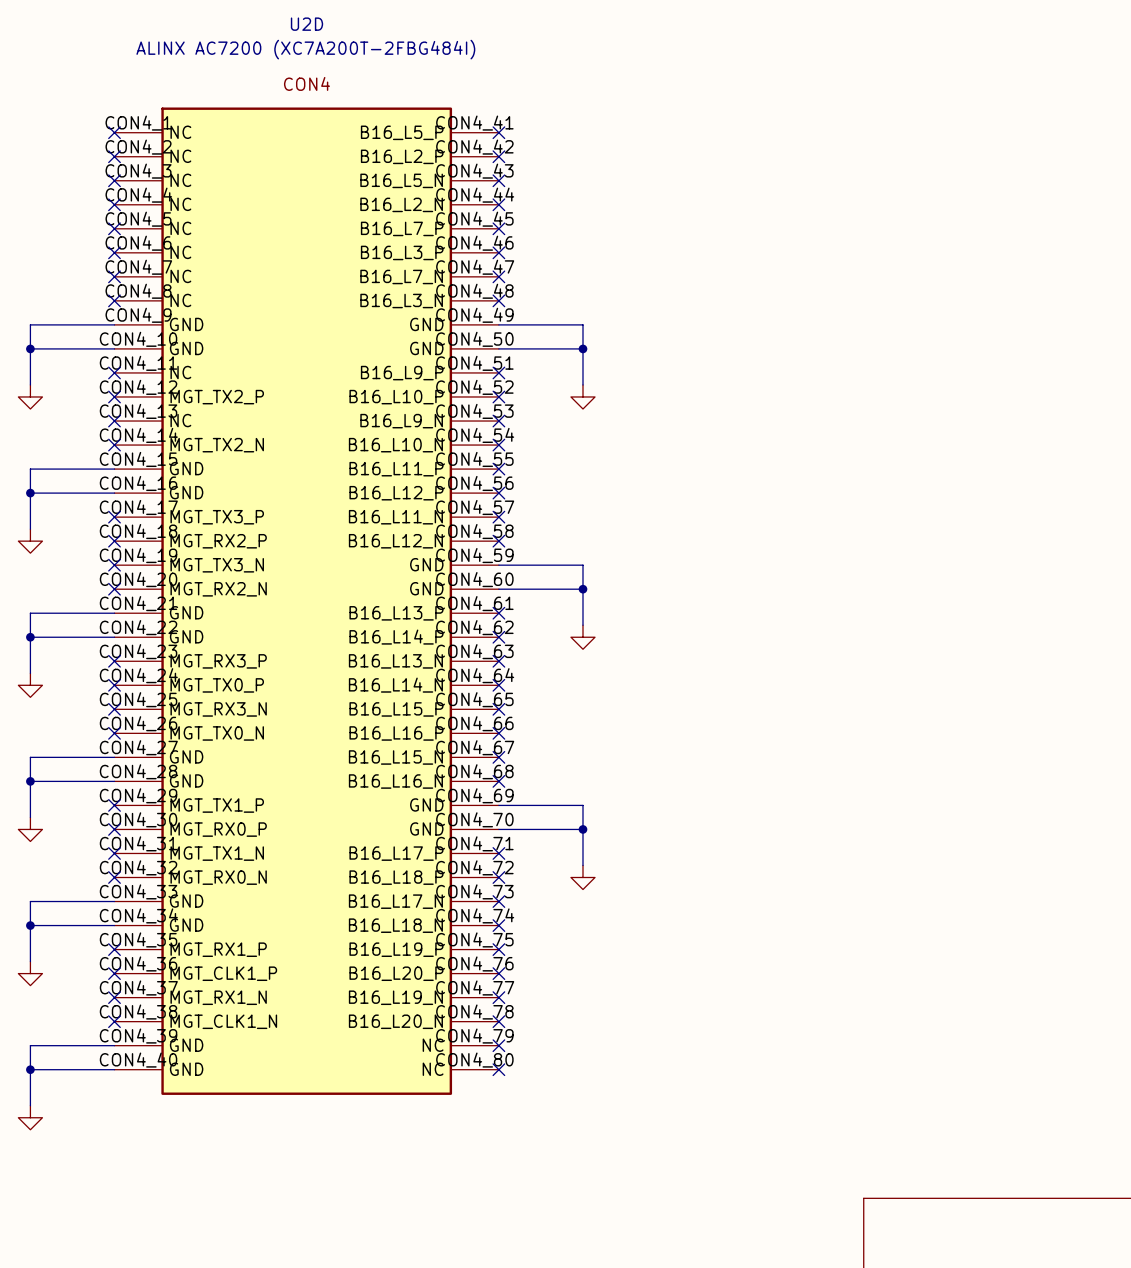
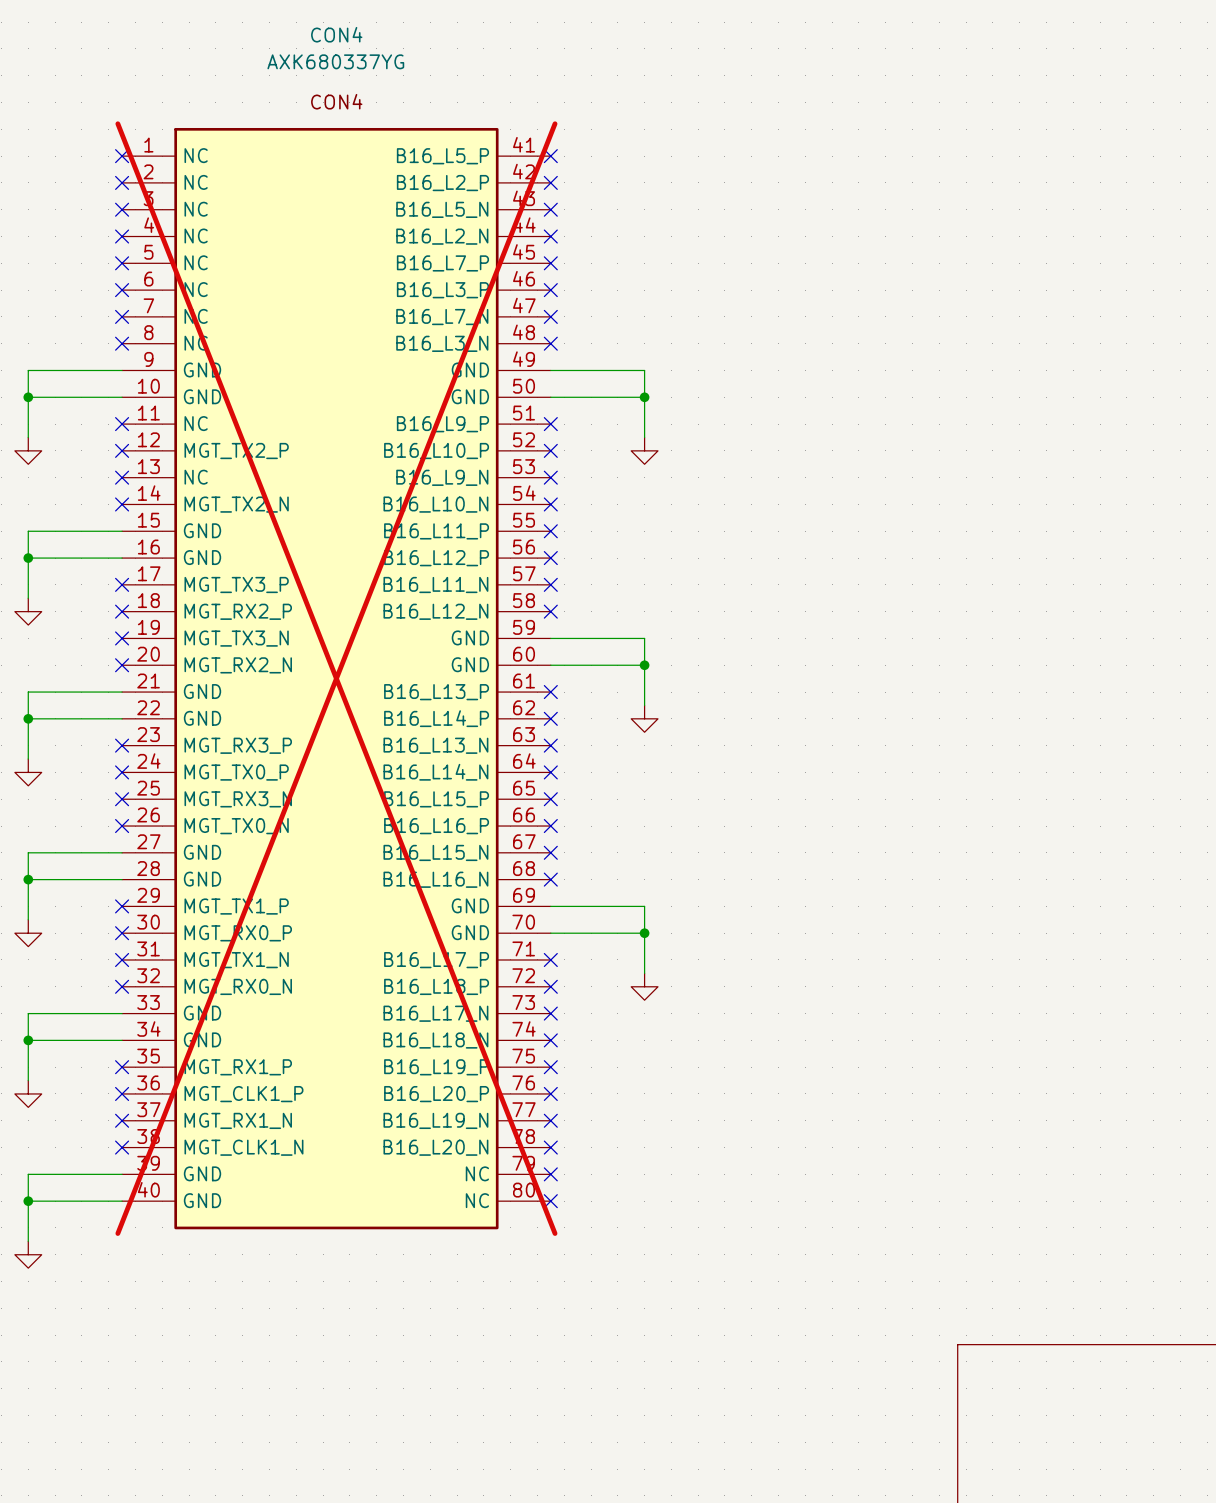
U2D name: U2D (306, 24) -> CON4 (336, 34)
U2D value: ALINX AC7200 (XC7A200T-2FBG484I) (305, 49) -> AXK680337YG (335, 61)
U2D symbol: [114, 107, 499, 1095] -> [122, 127, 551, 1230]
U2D do-not-place cross: none -> (336, 678)

